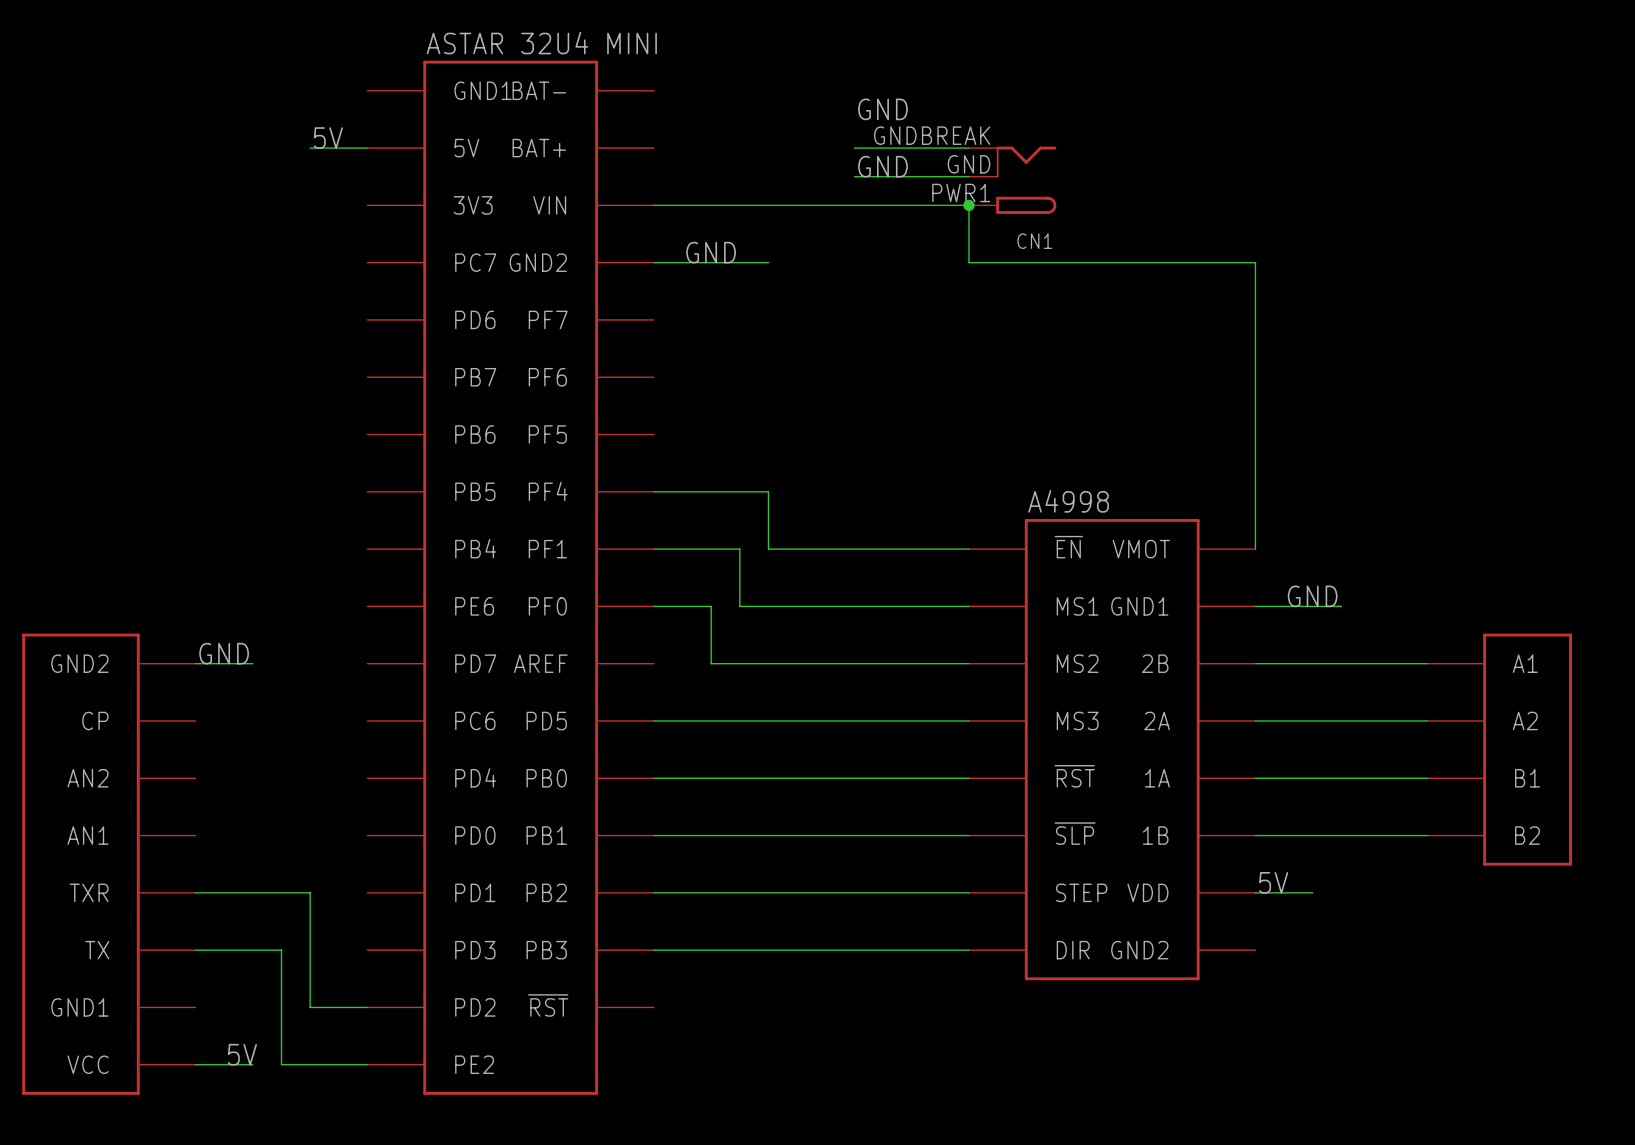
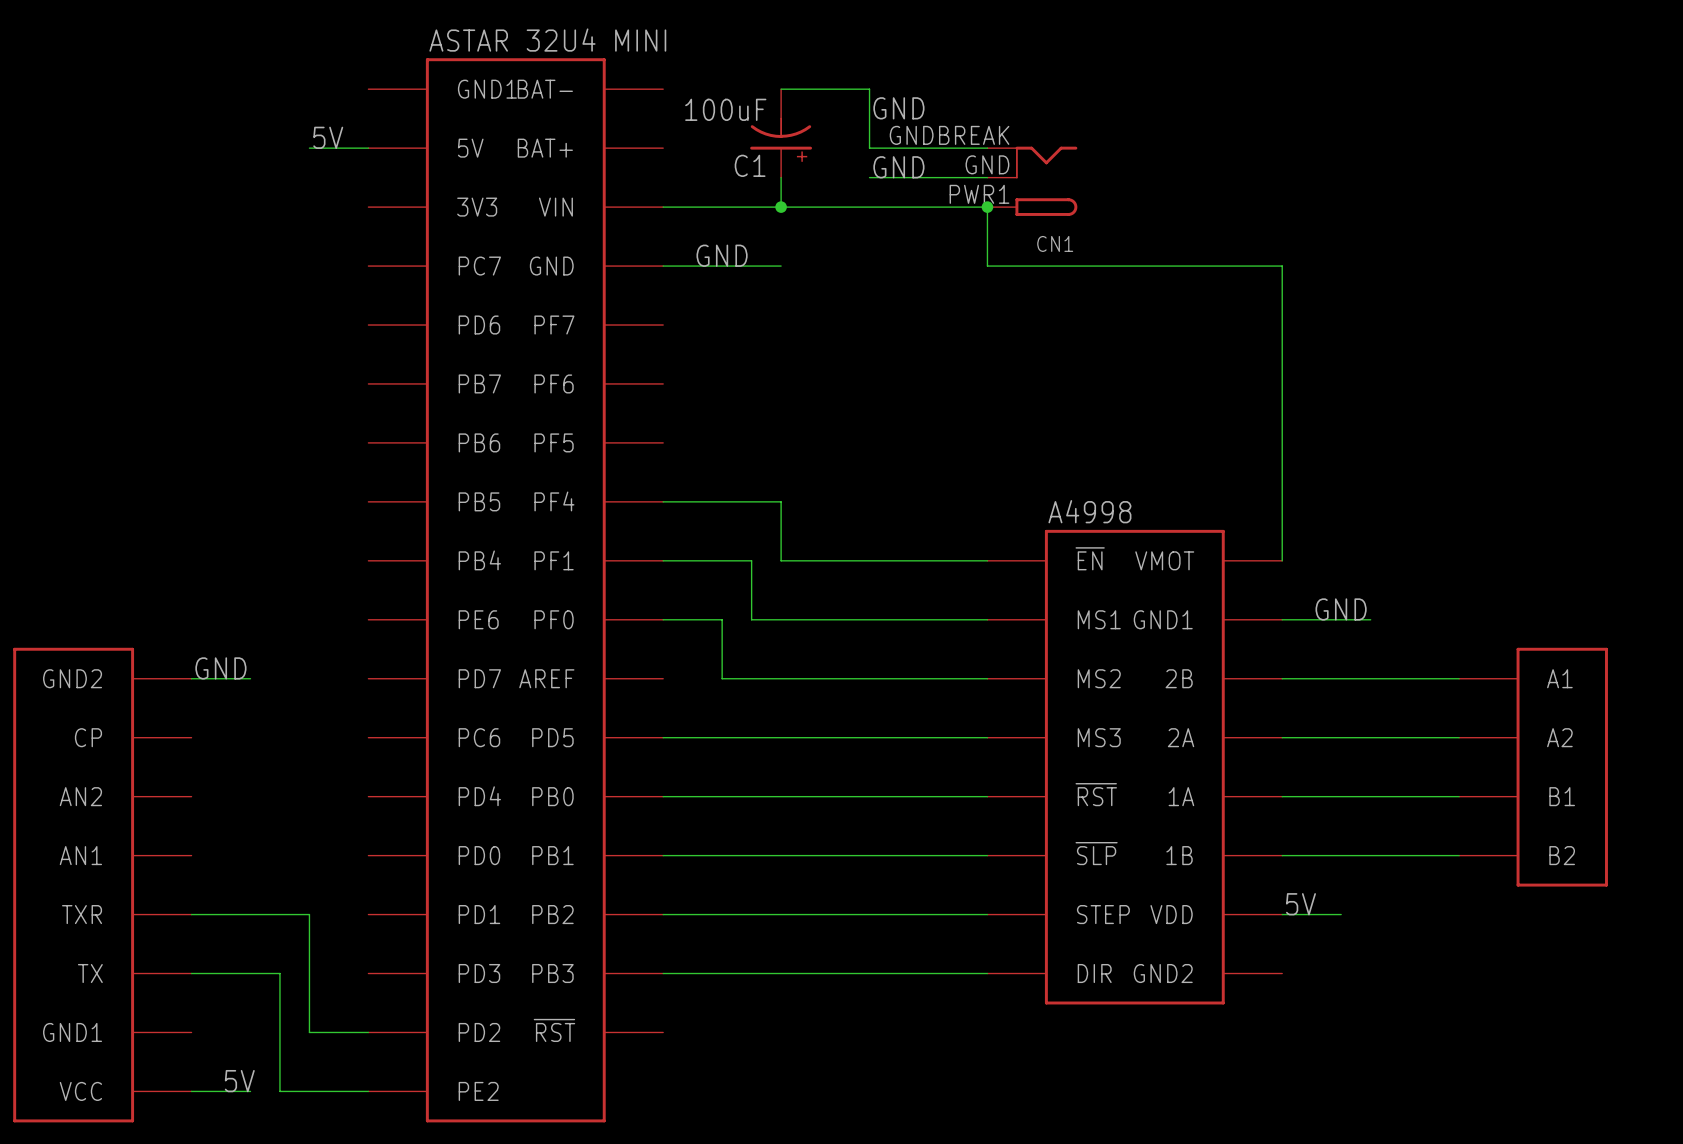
wire: none -> (781, 89) (869, 89) (869, 148)
C1: none -> 100uF (781, 133)
wire: none -> (781, 177) (781, 207)
junction: none -> (781, 207)
part pin name: GND2 (538, 262) -> GND (551, 266)

